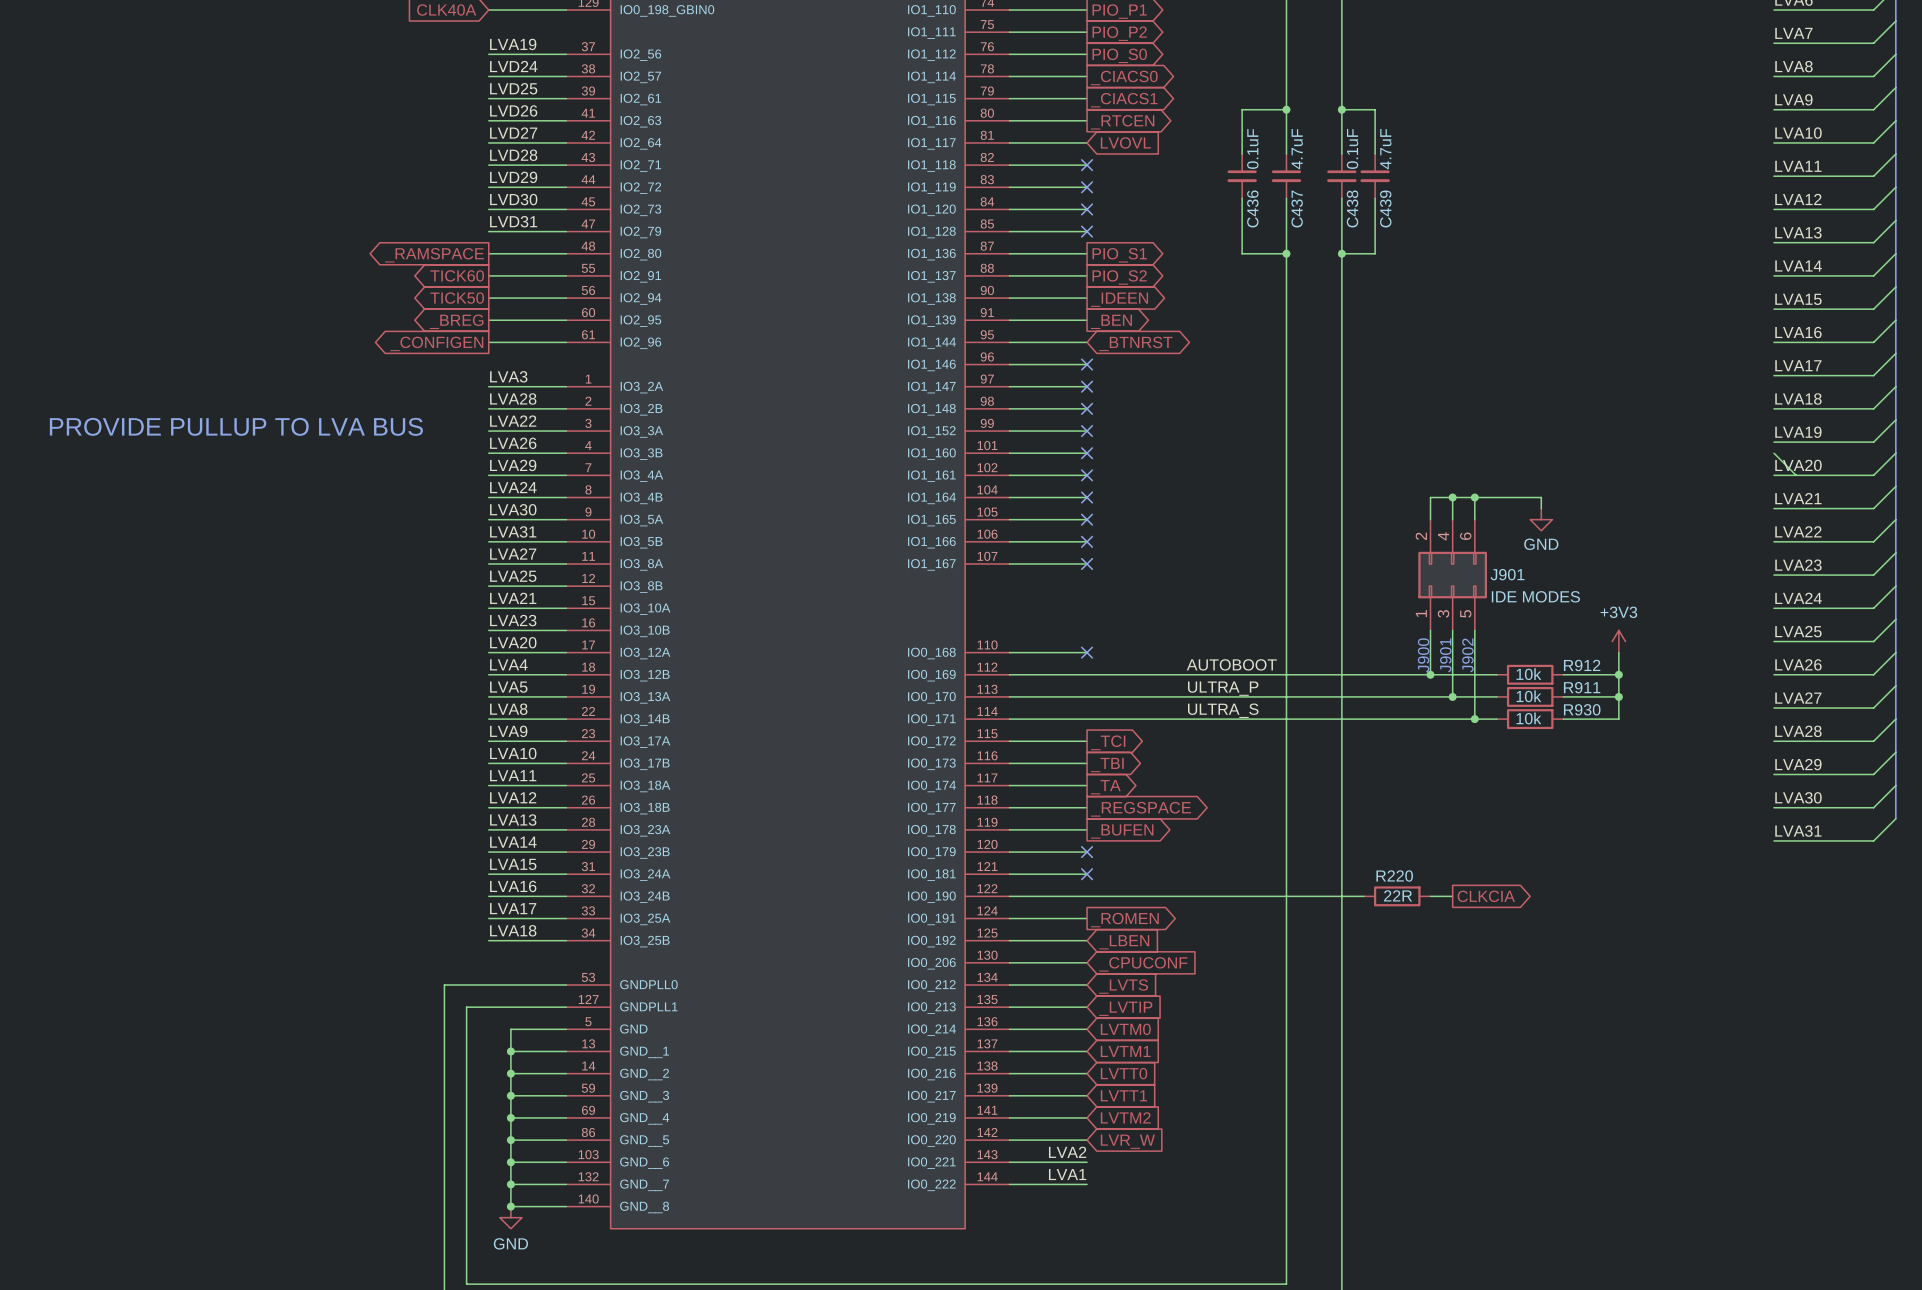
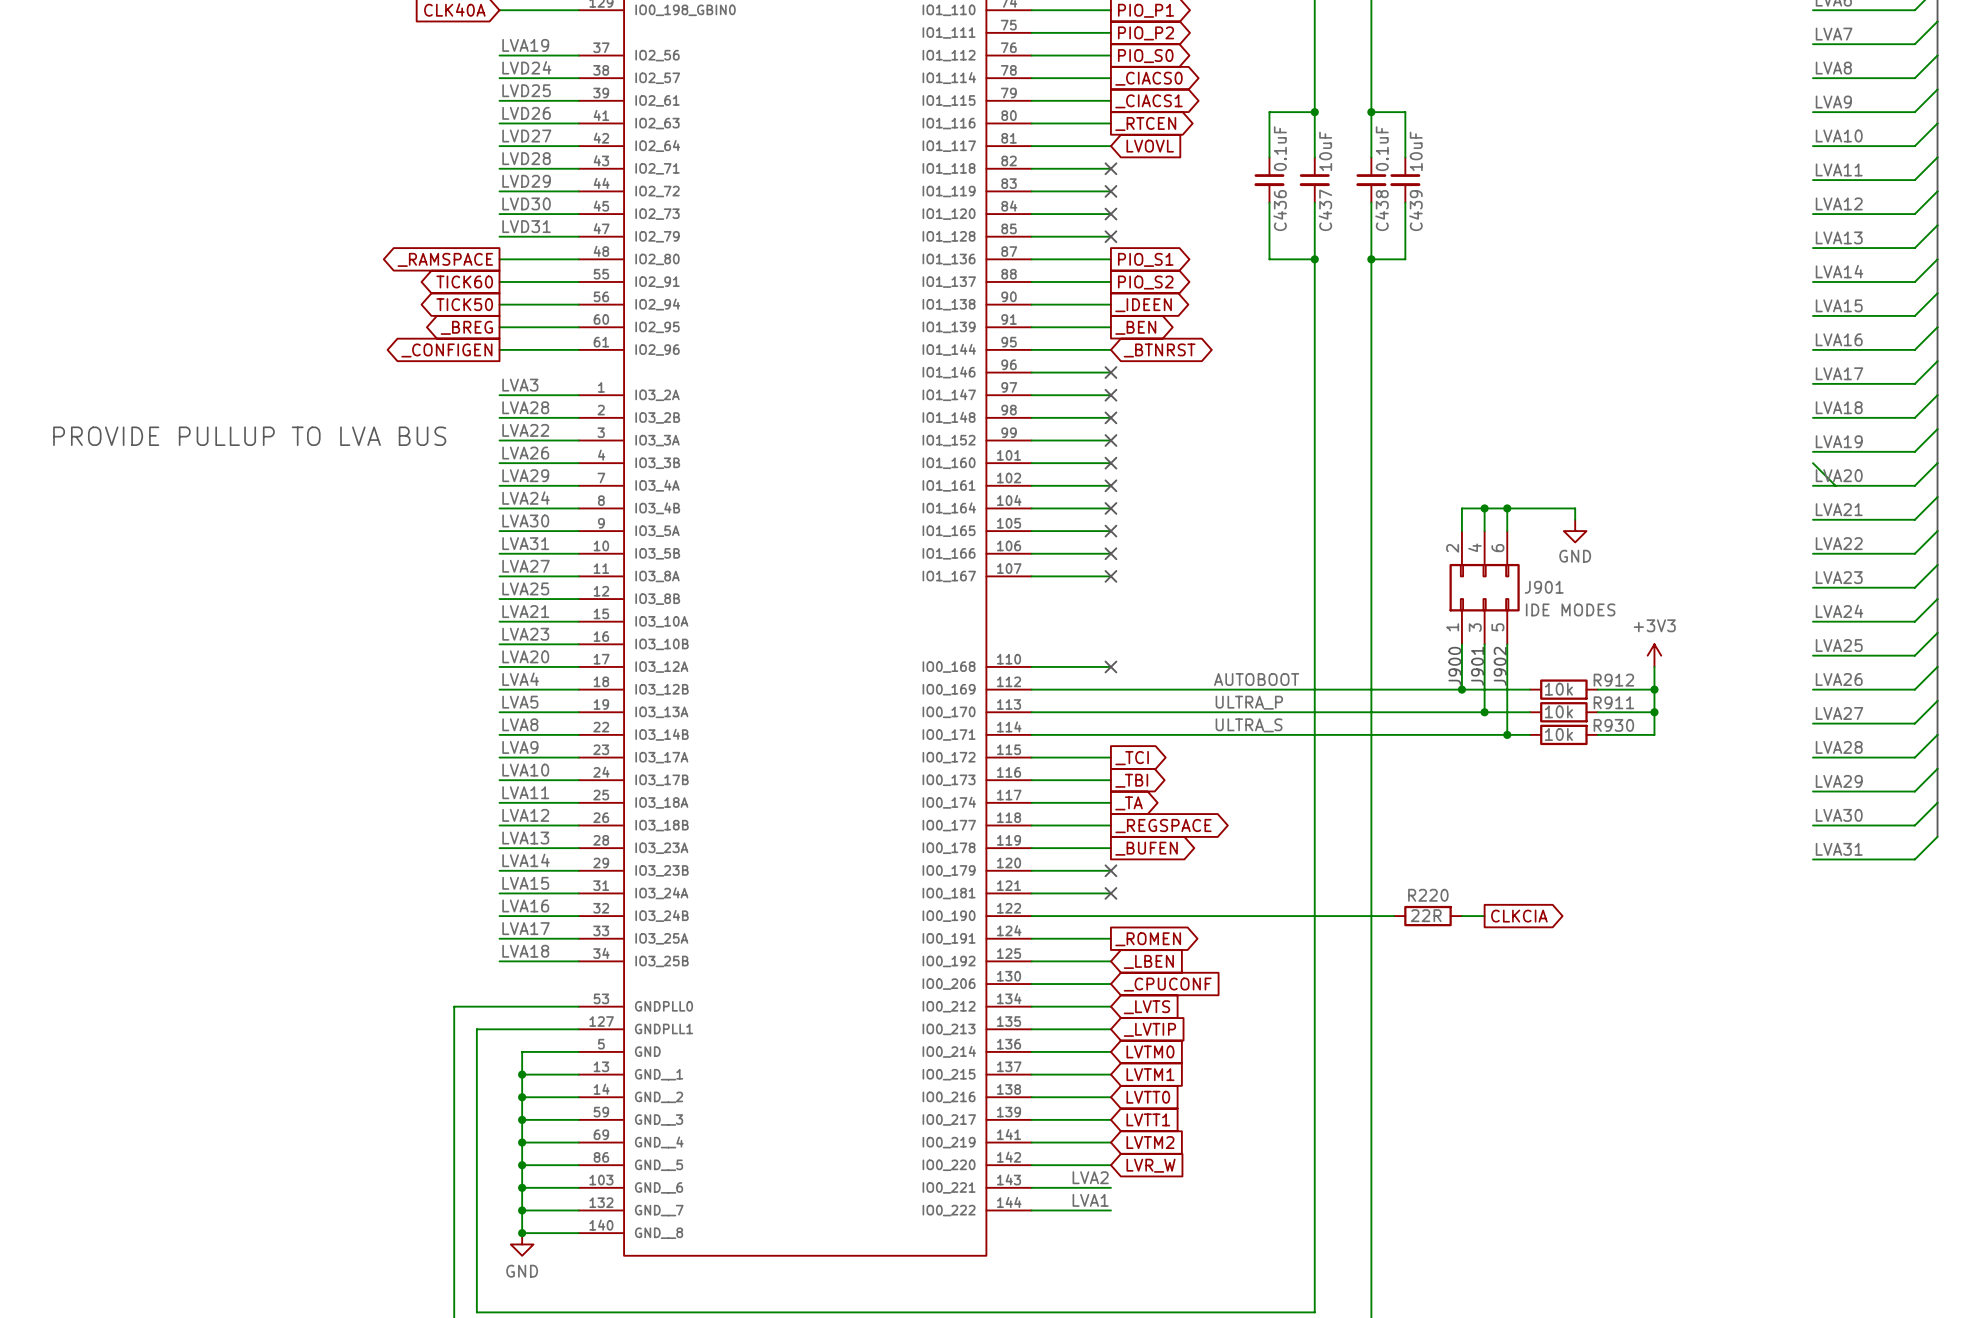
C437 value: 4.7uF (1297, 149) -> 10uF (1325, 151)
C439 value: 4.7uF (1385, 149) -> 10uF (1416, 151)

